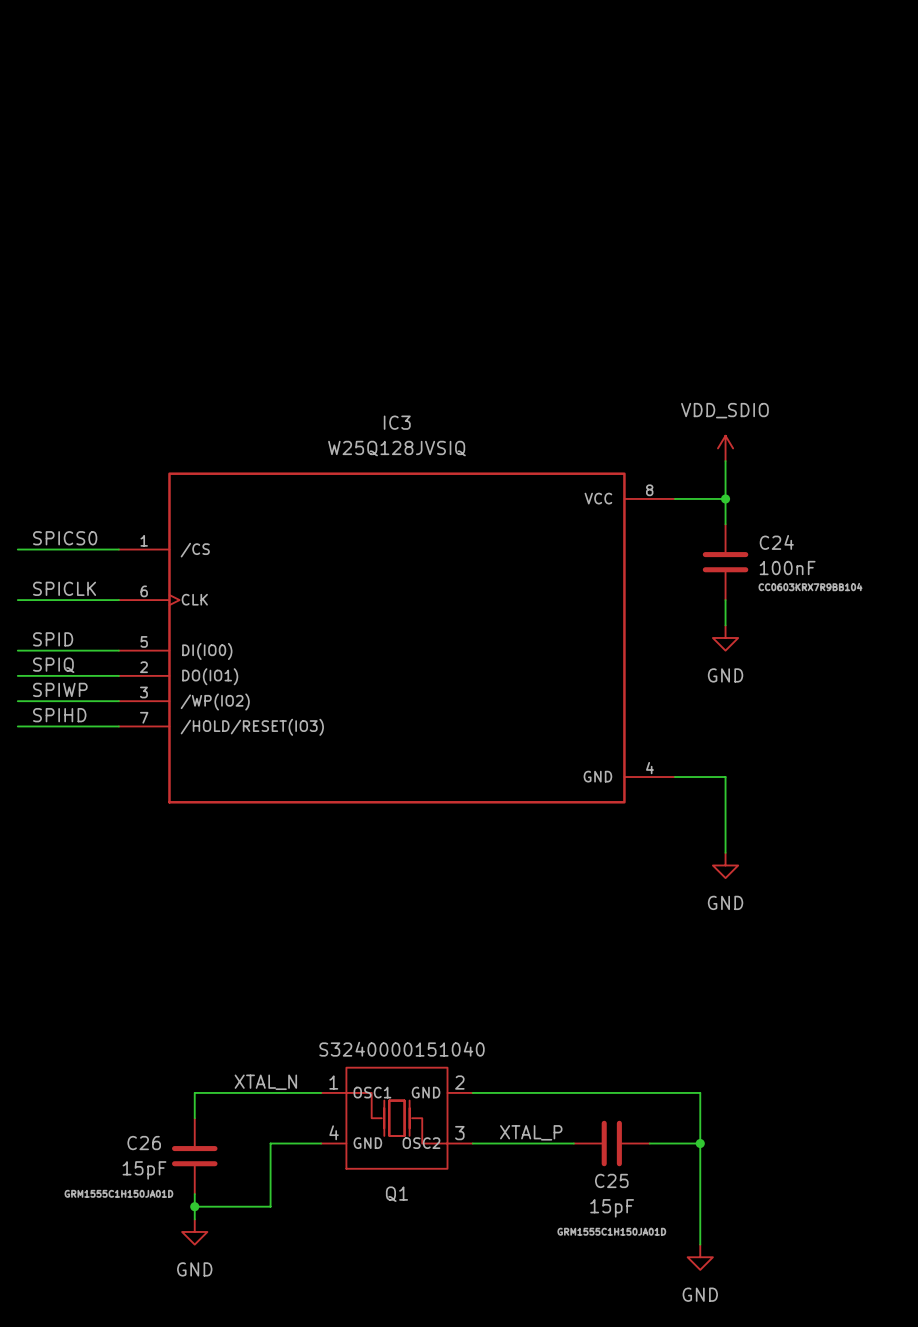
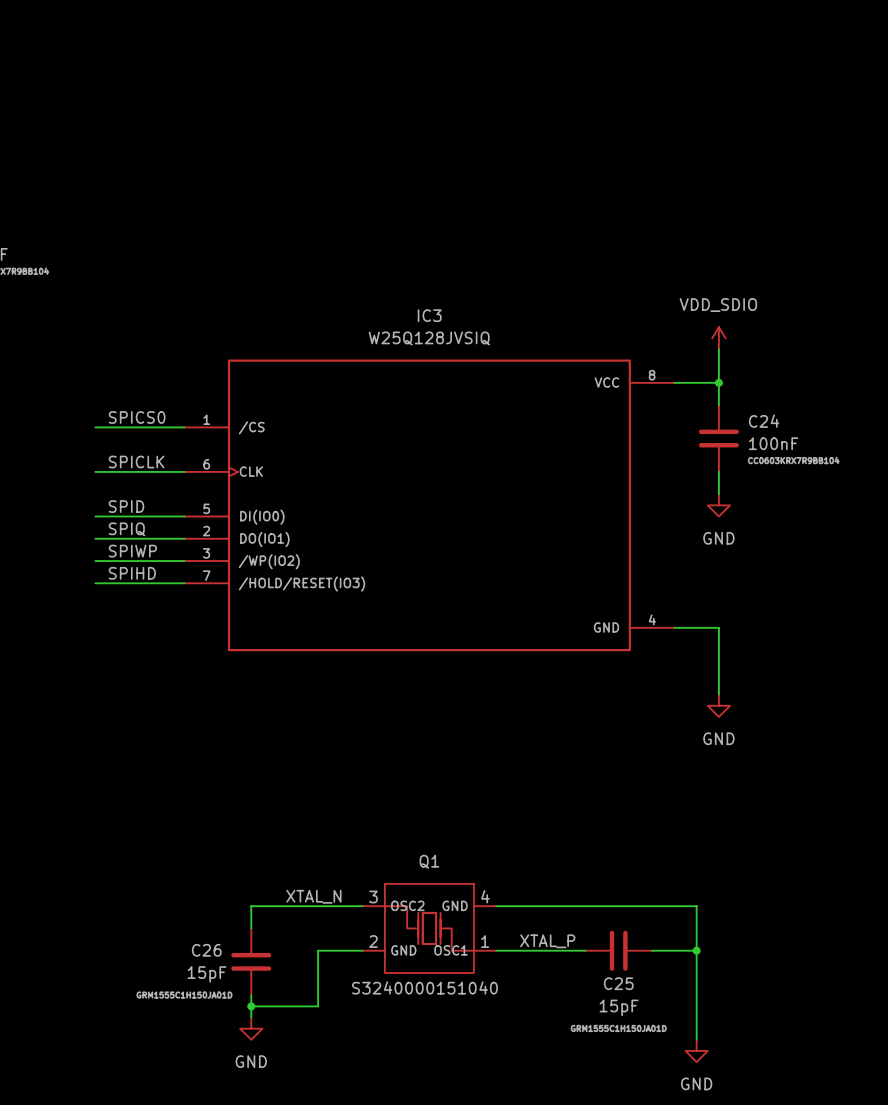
Q1 rotation: 0° (396, 1118) -> 180° (429, 928)

